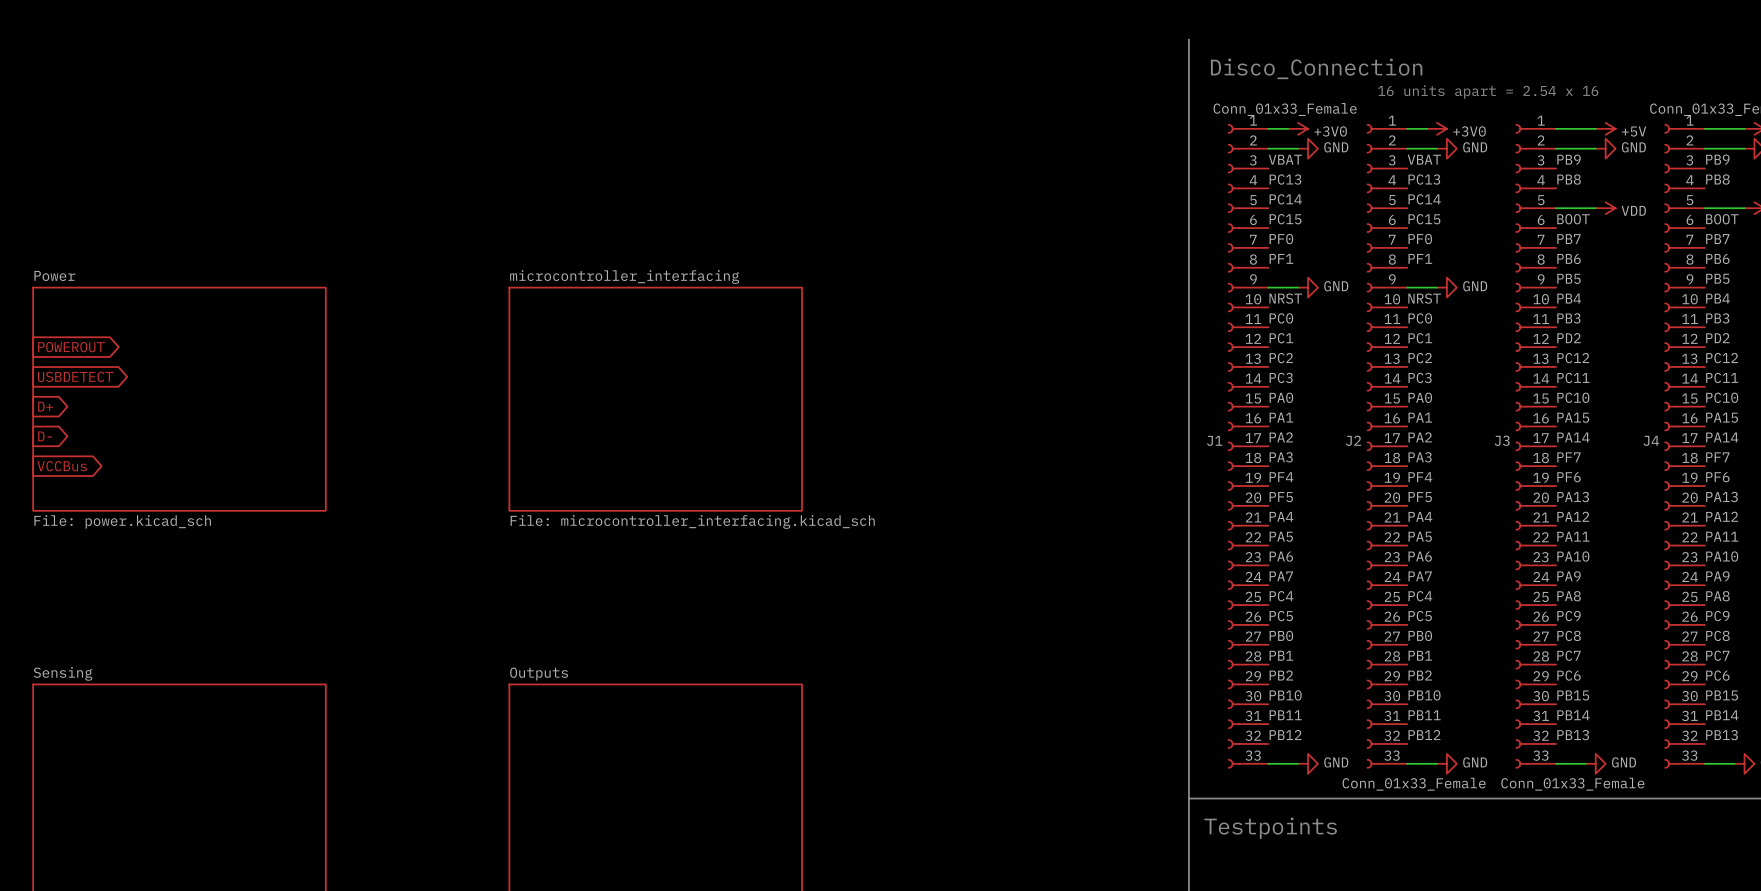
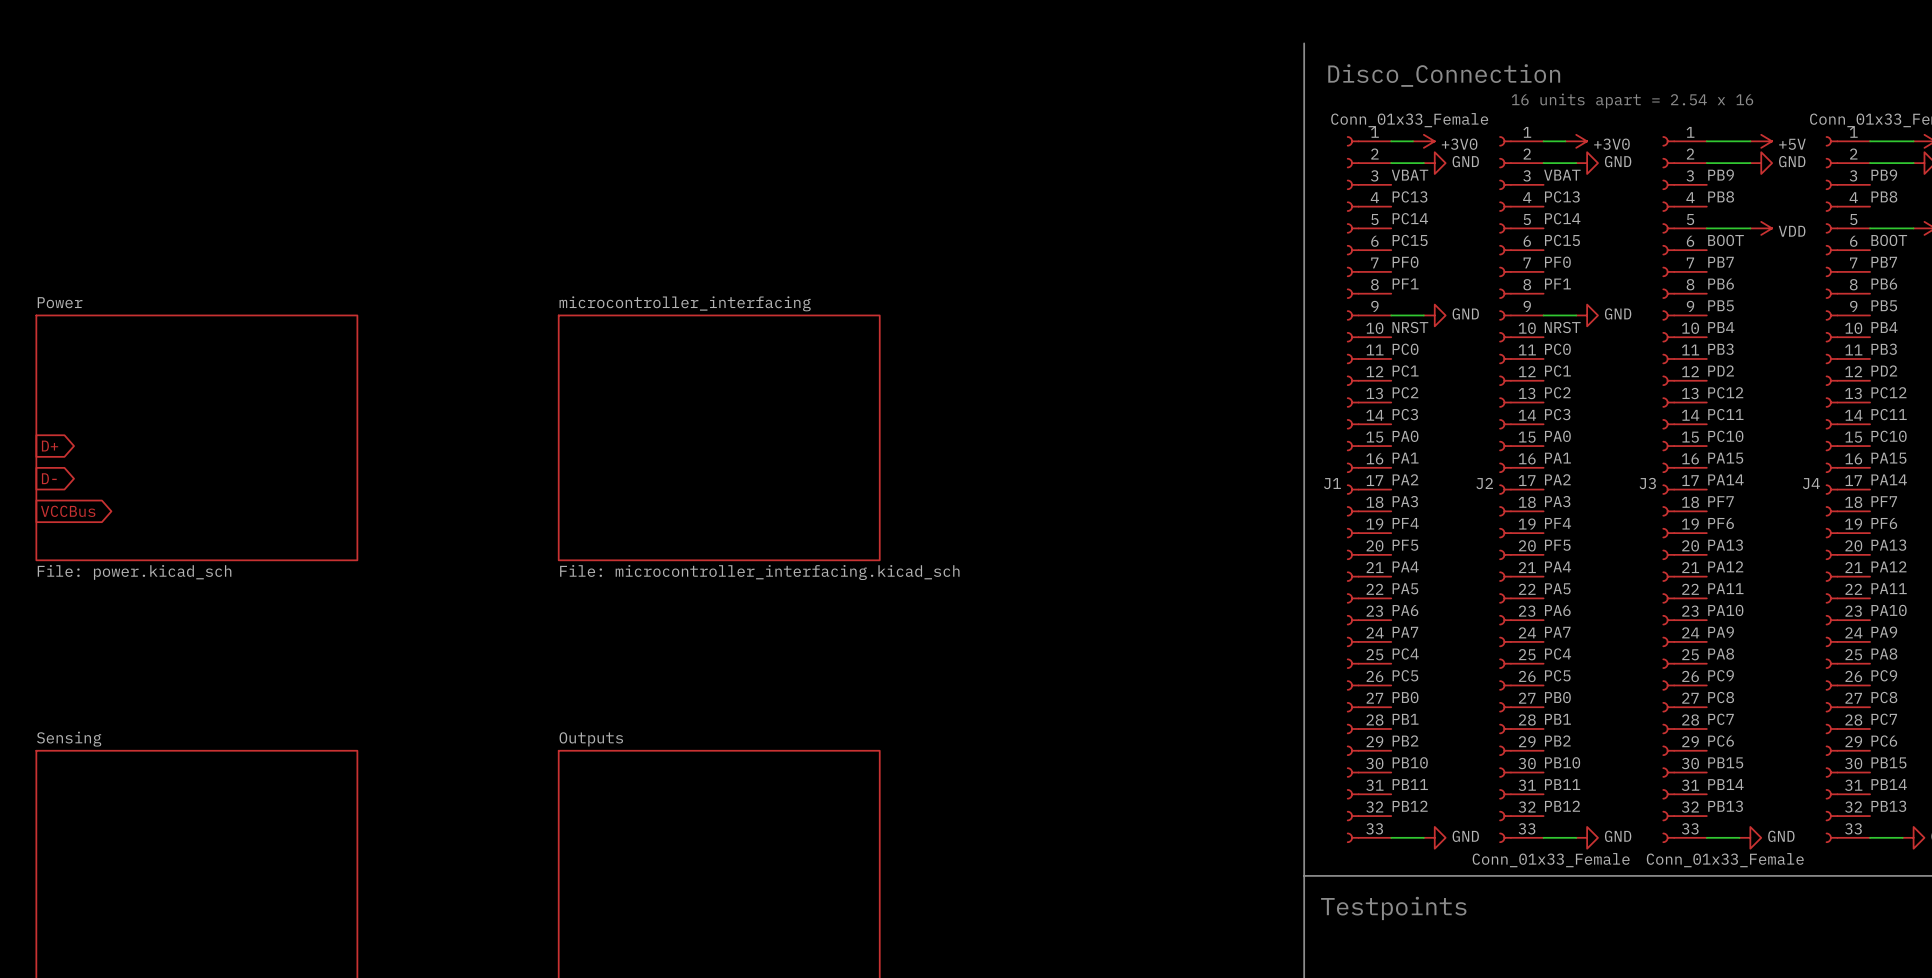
global label: POWEROUT (71, 347) -> none
global label: USBDETECT (75, 376) -> none

